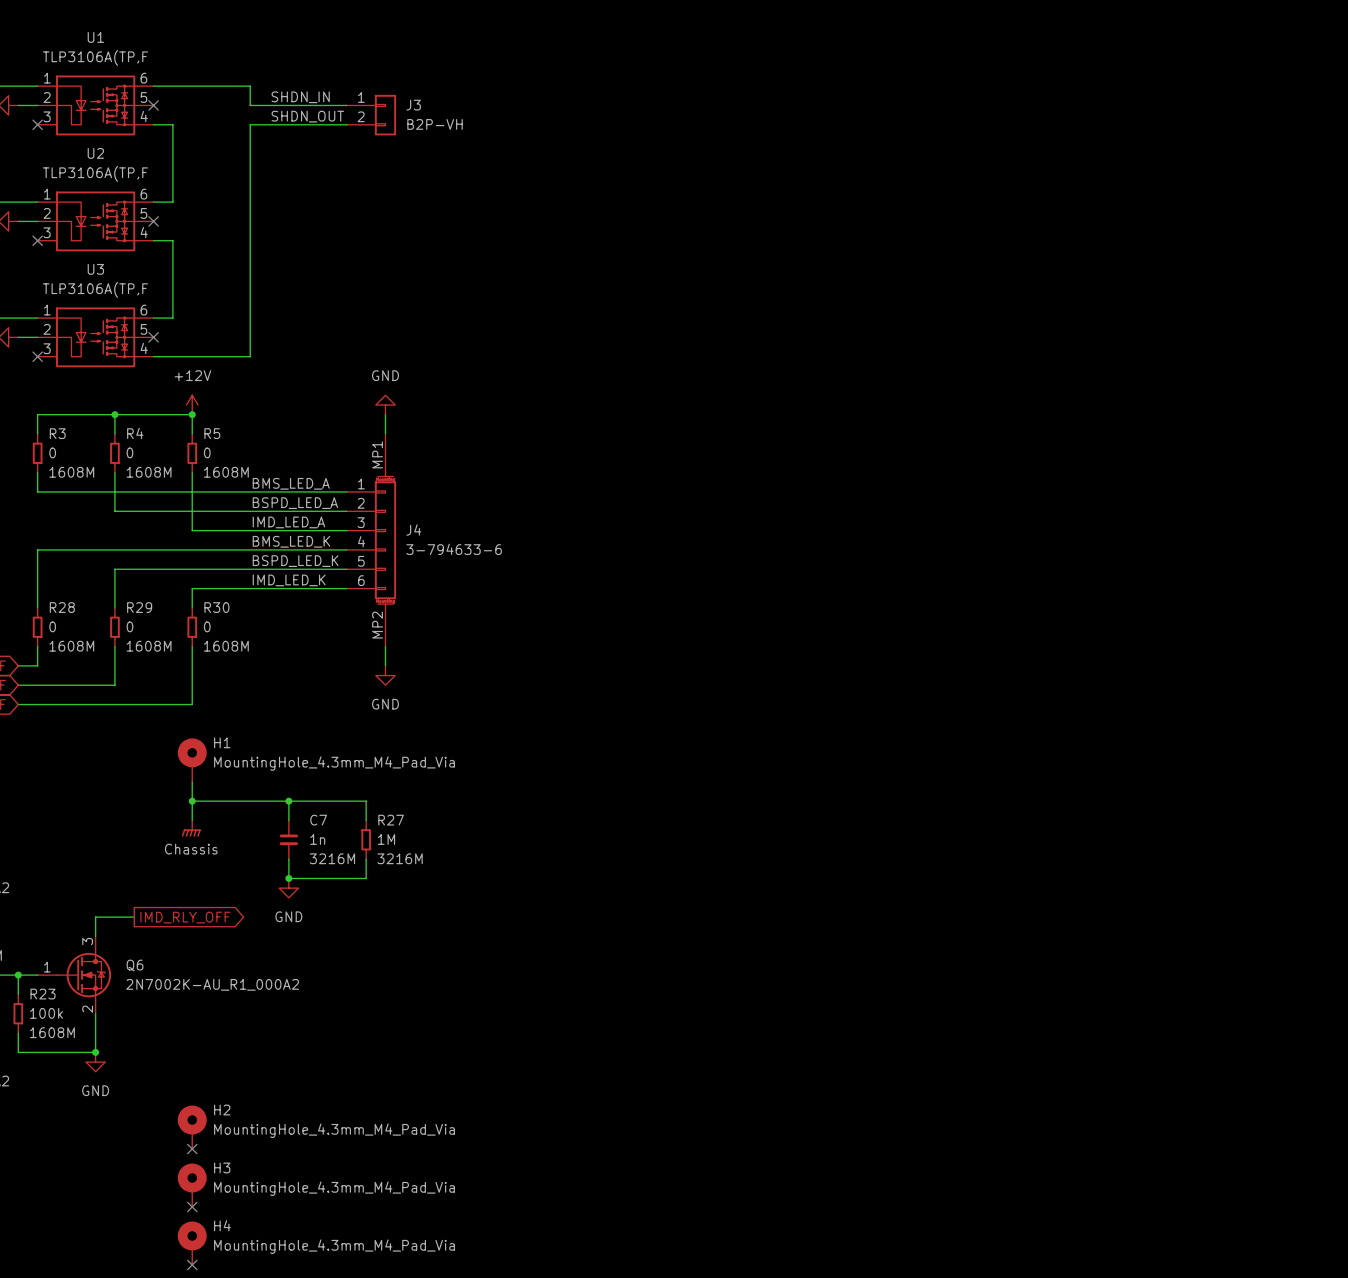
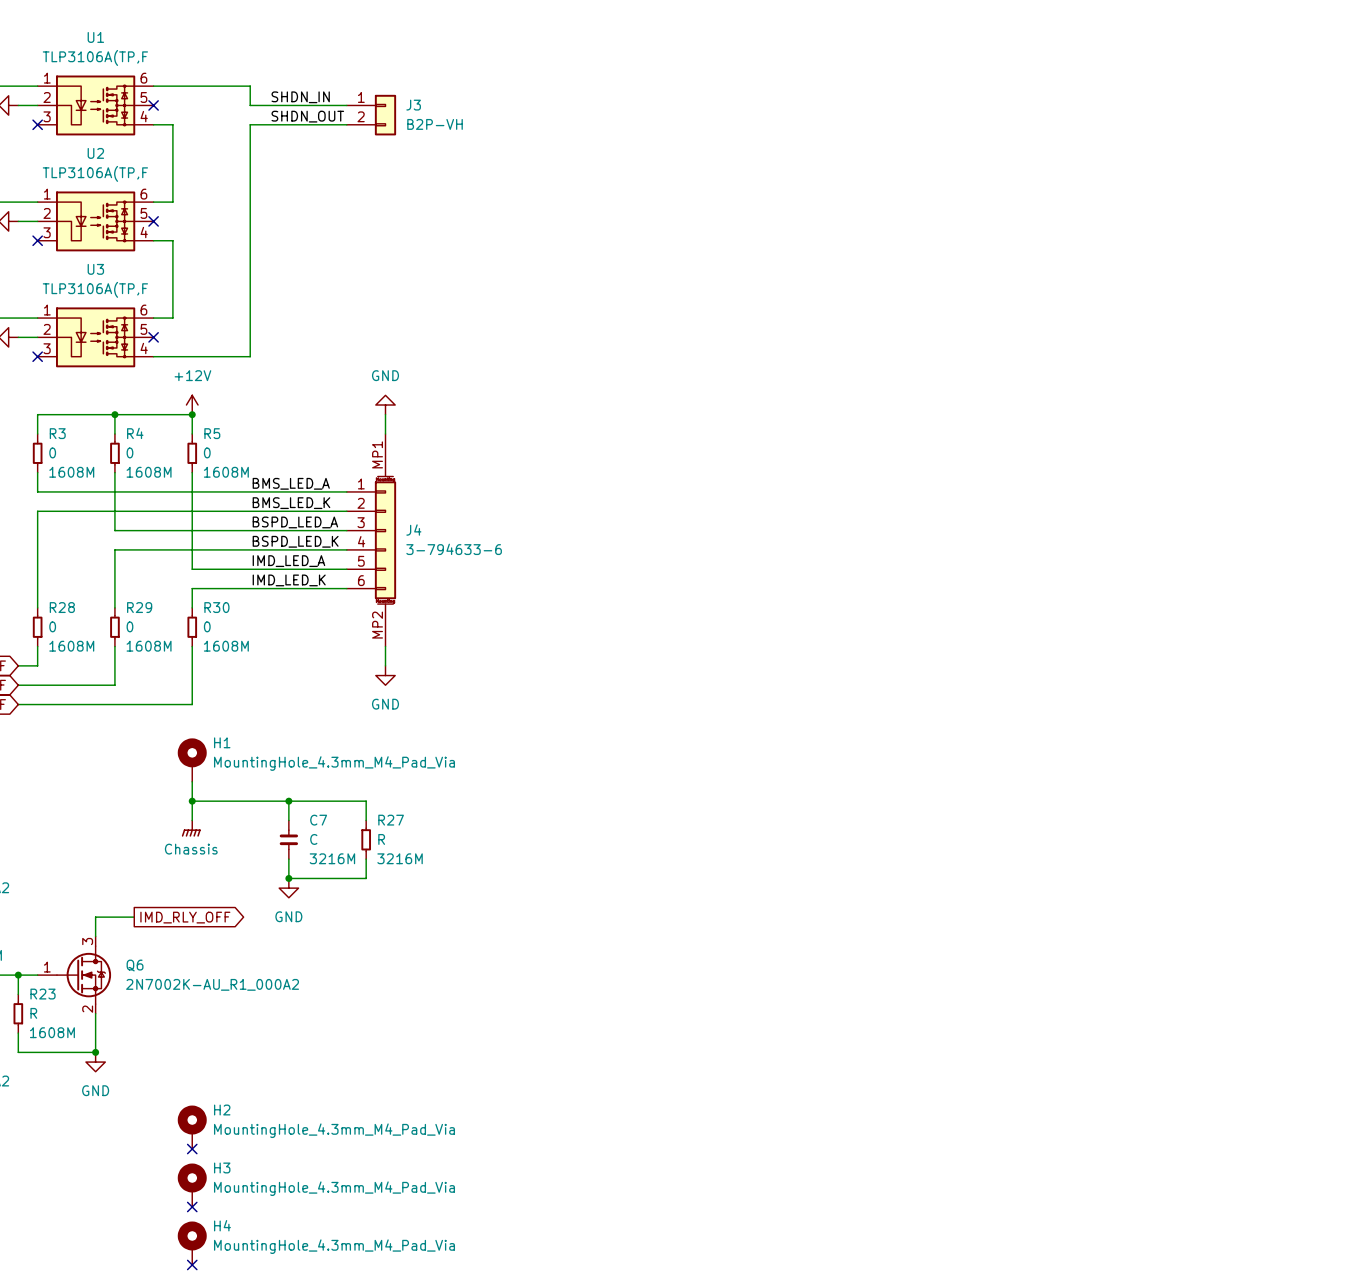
label: BSPD_LED_A (295, 503) -> BMS_LED_K (291, 503)
label: IMD_LED_A (288, 522) -> BSPD_LED_A (295, 522)
label: BMS_LED_K (291, 541) -> BSPD_LED_K (295, 541)
wire: (37, 549) (114, 549) -> (114, 569) (114, 549)
label: BSPD_LED_K (295, 561) -> IMD_LED_A (288, 561)
wire: (114, 569) (192, 569) -> (37, 549) (37, 511) (114, 511) (114, 530) (192, 530) (192, 569)
C7 value: 1n (317, 839) -> C (313, 839)
R27 value: 1M (386, 839) -> R (381, 839)
R23 value: 100k (46, 1013) -> R (33, 1013)

